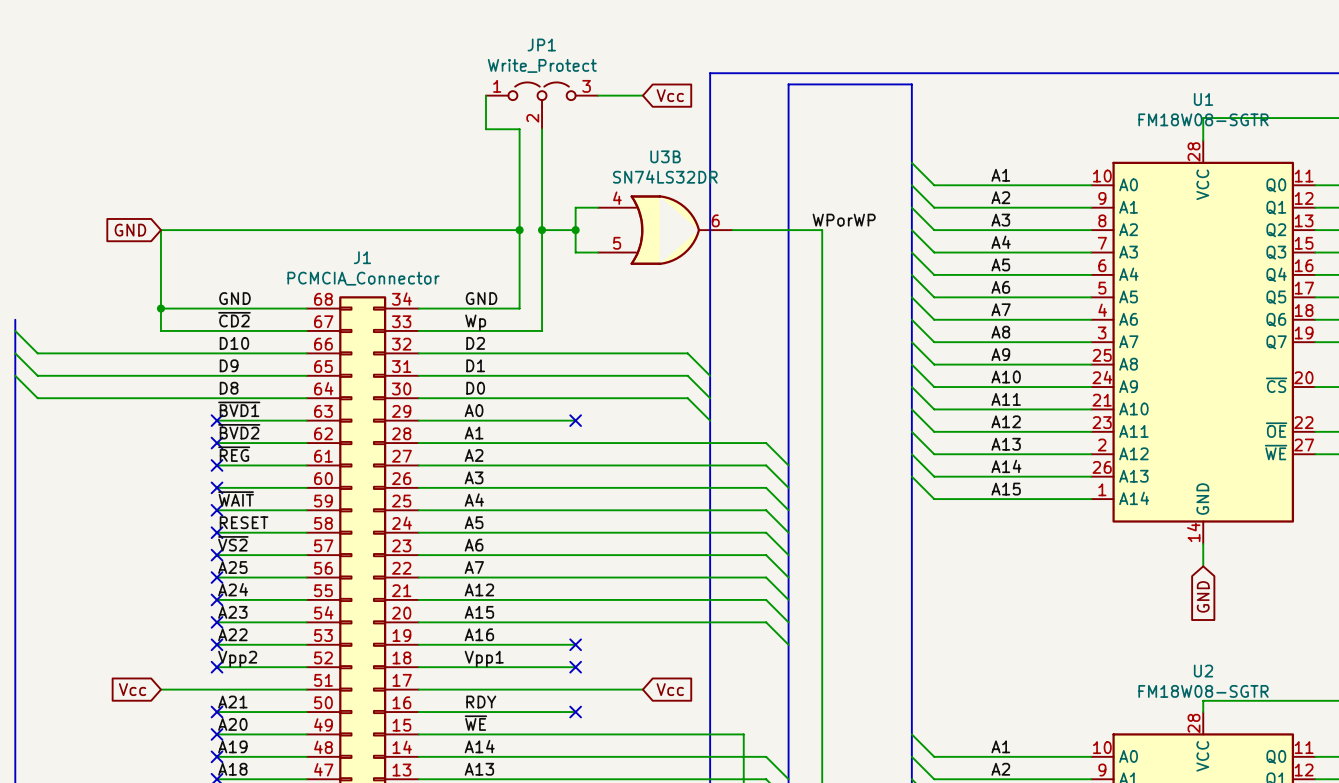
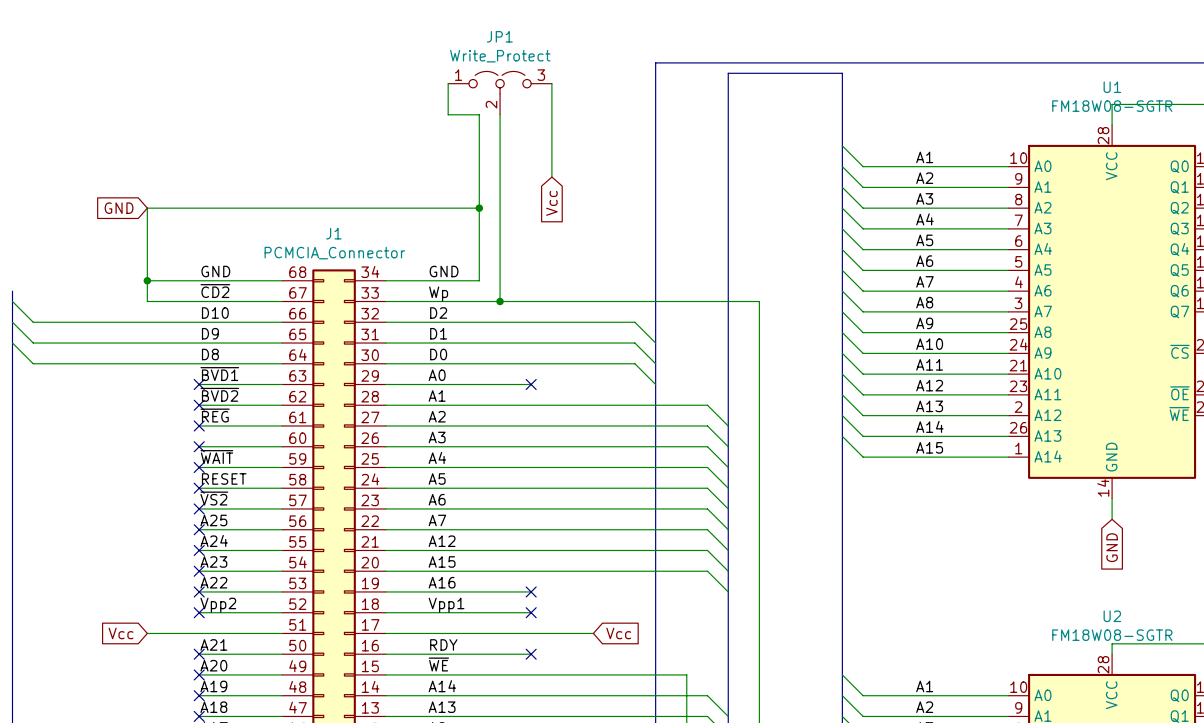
wire: (598, 95) (642, 95) -> (551, 83) (551, 177)
global label rotation: 0° (670, 95) -> 90° clockwise (551, 203)
global label position: Vcc (670, 95) -> Vcc (551, 203)
wire: (598, 207) (575, 207) (575, 252) (598, 252) -> none
label: WPorWP (844, 220) -> none
wire: (542, 230) (575, 230) -> none
junction: (542, 230) -> none
junction: (575, 230) -> none
U3B: SN74LS32DR (665, 230) -> none
wire: (732, 230) (822, 230) (822, 330) -> (500, 301) (759, 301)
junction: none -> (500, 301)

